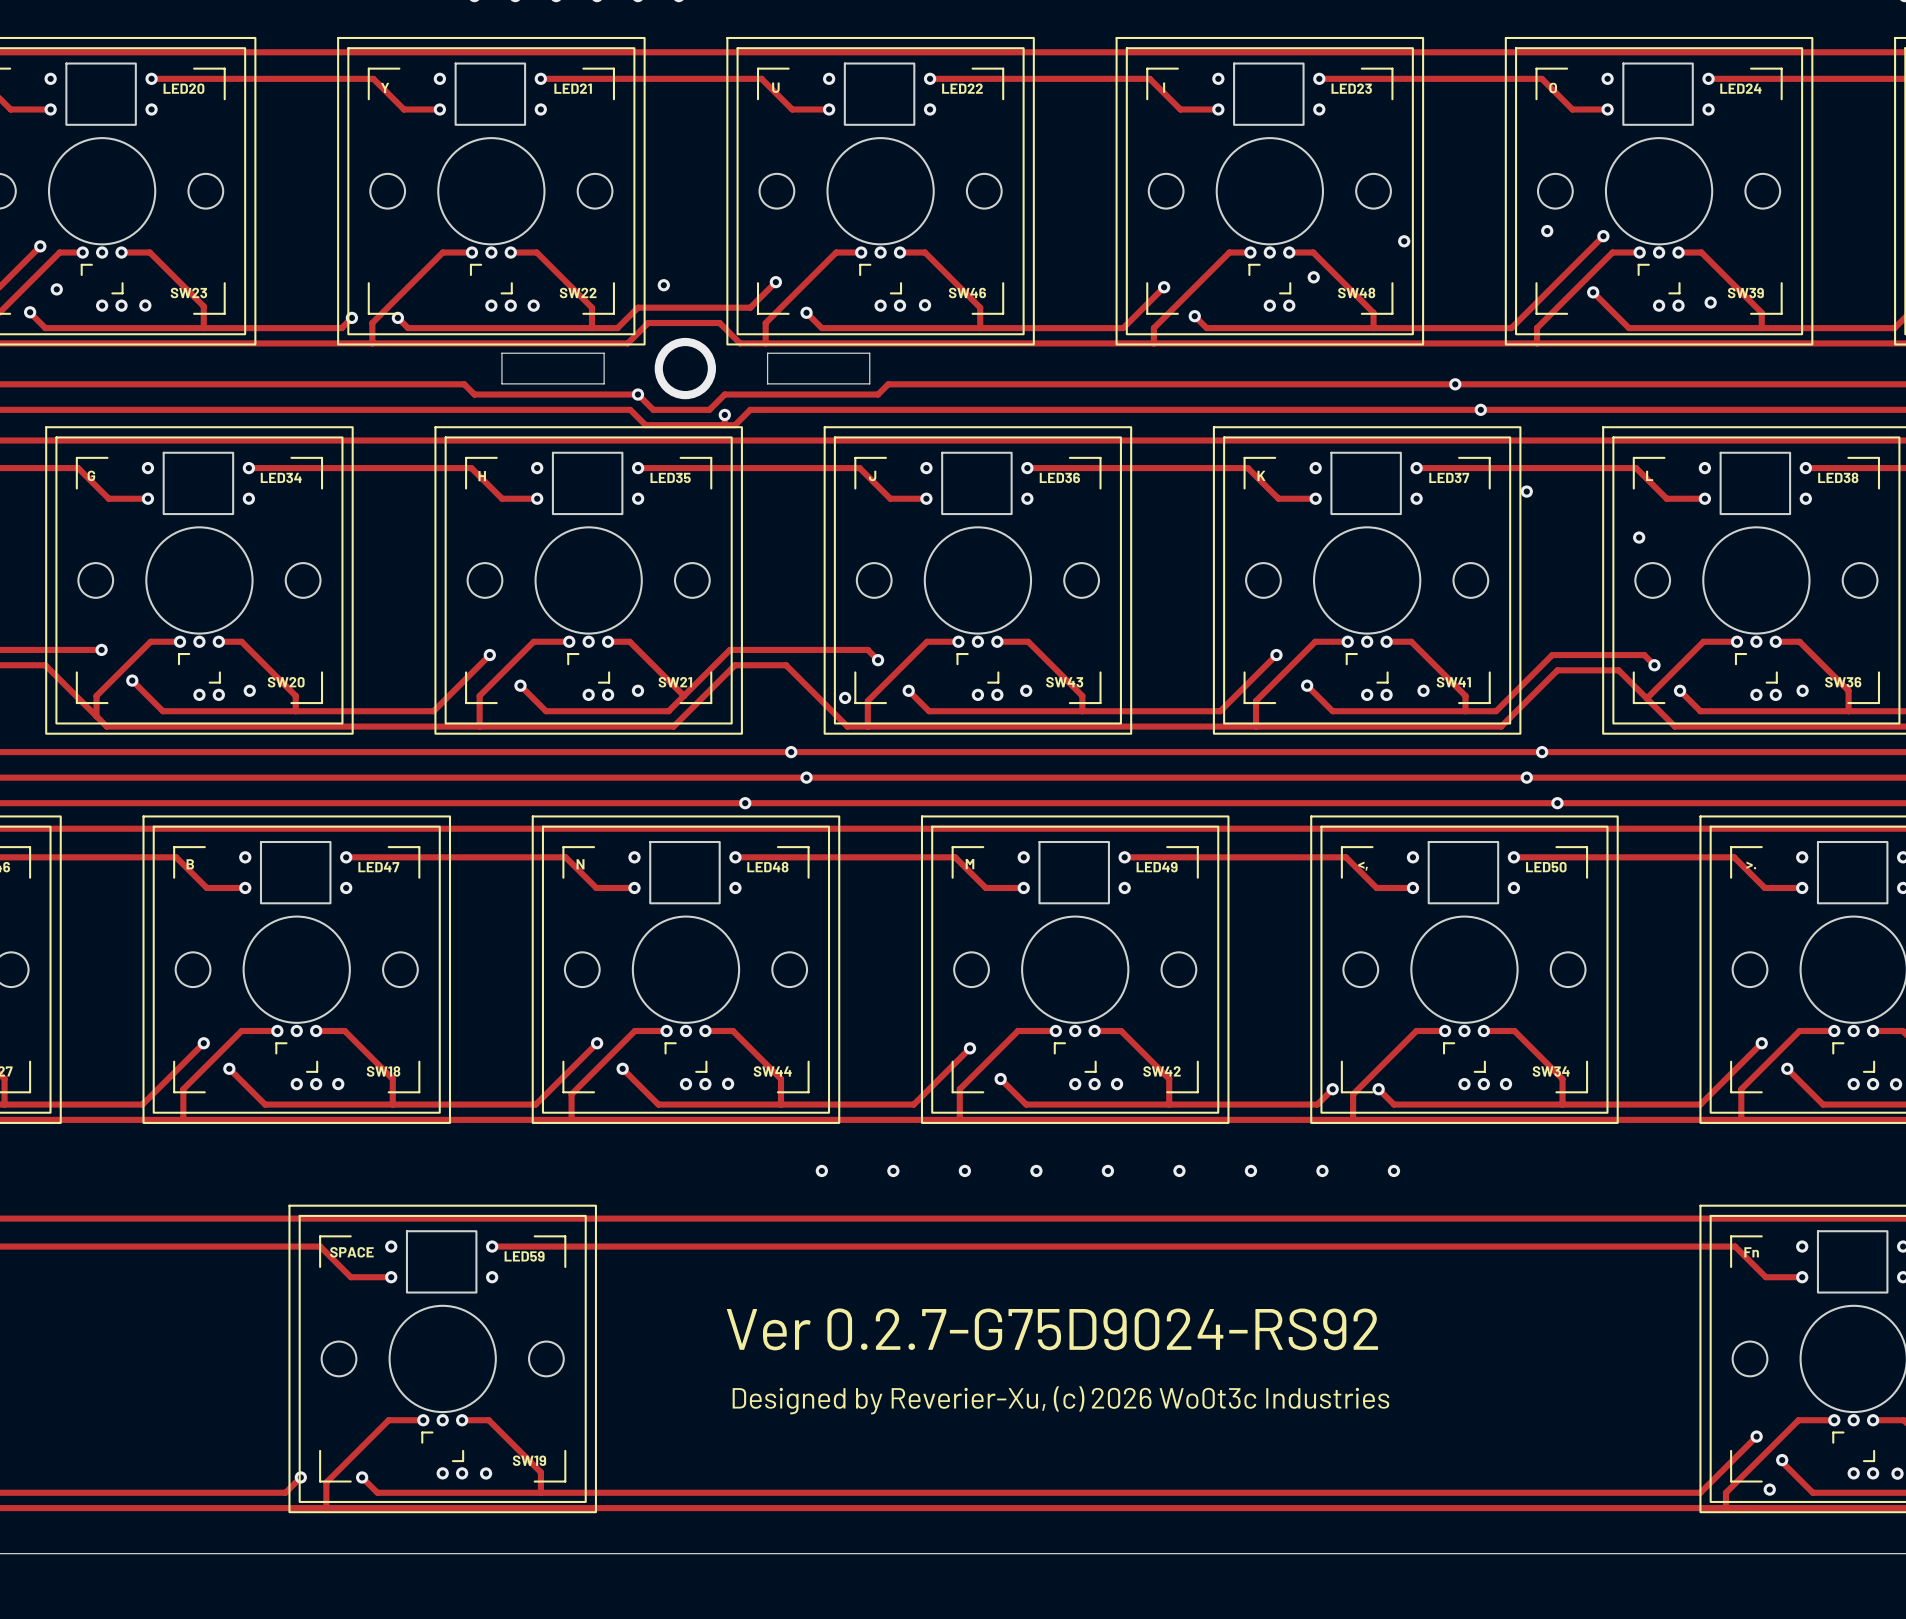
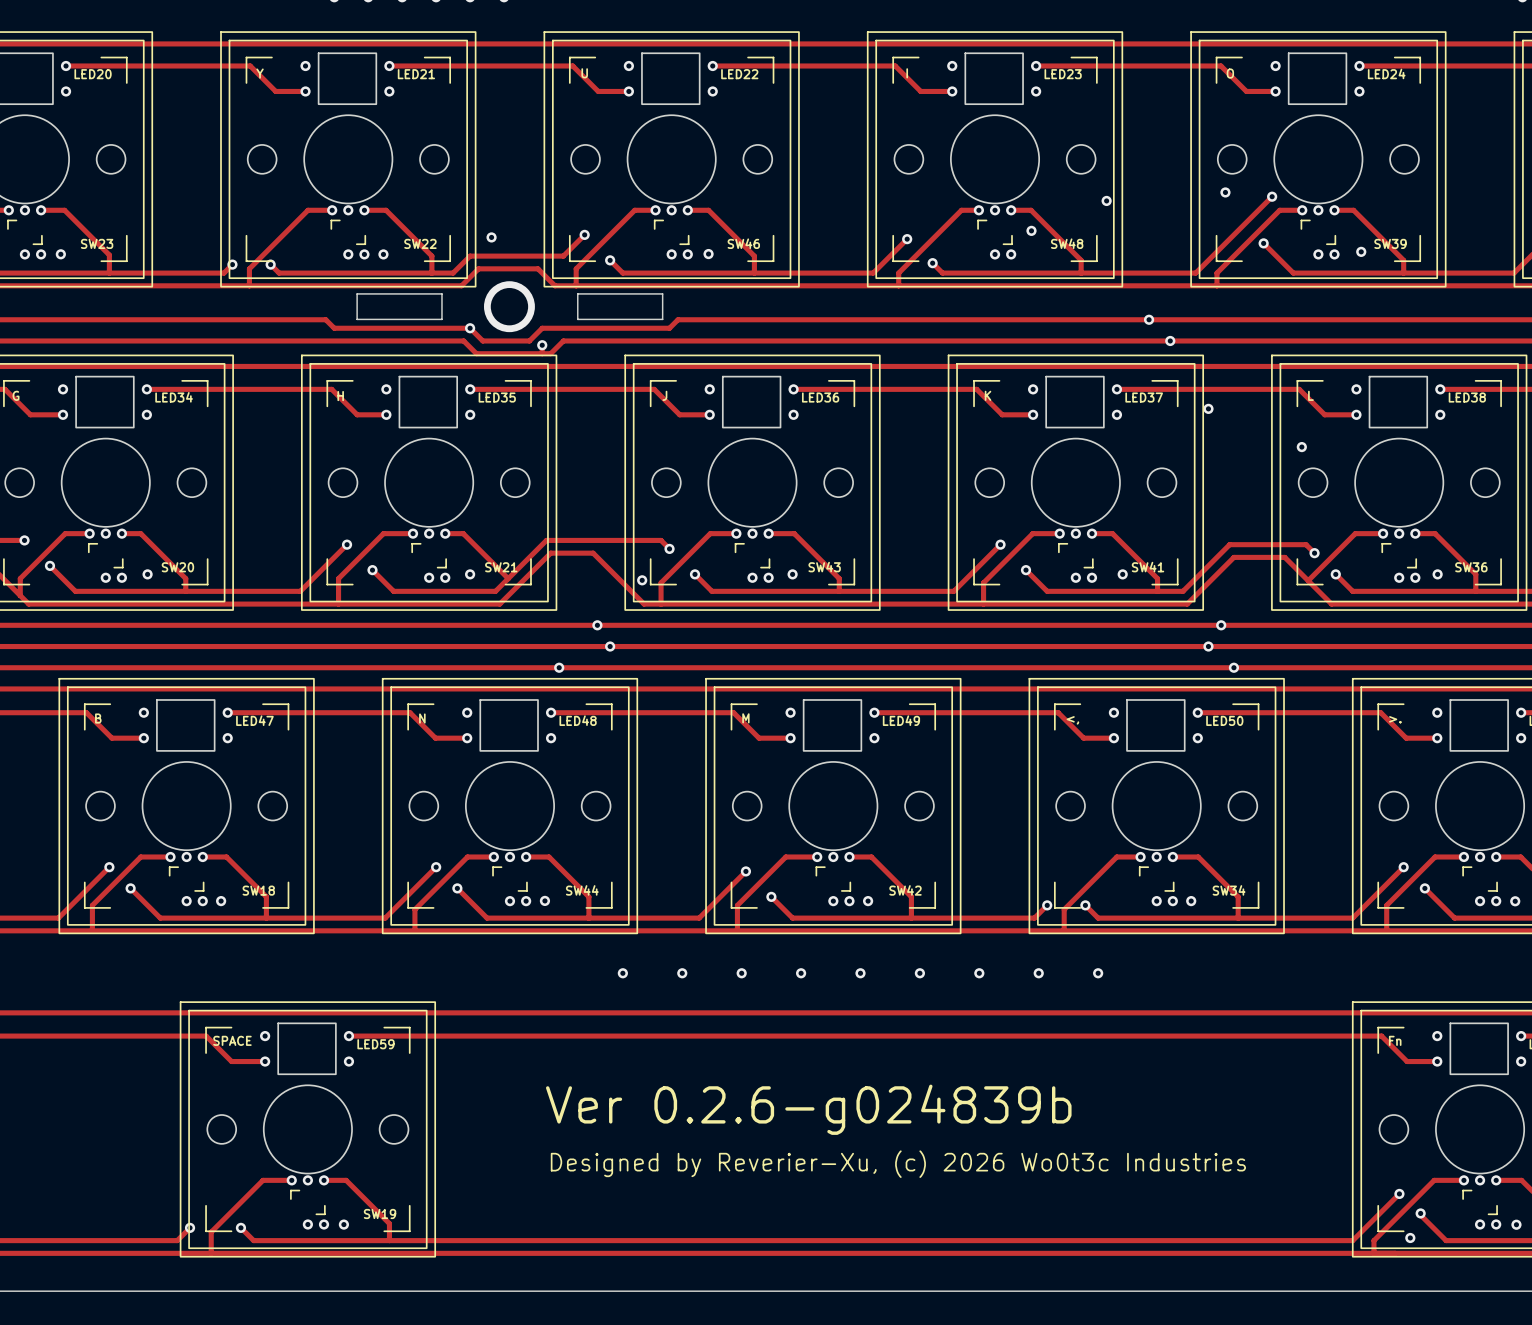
text: Ver 0.2.7-G75D9024-RS92 (1052, 1329) -> Ver 0.2.6-g024839b (808, 1109)

